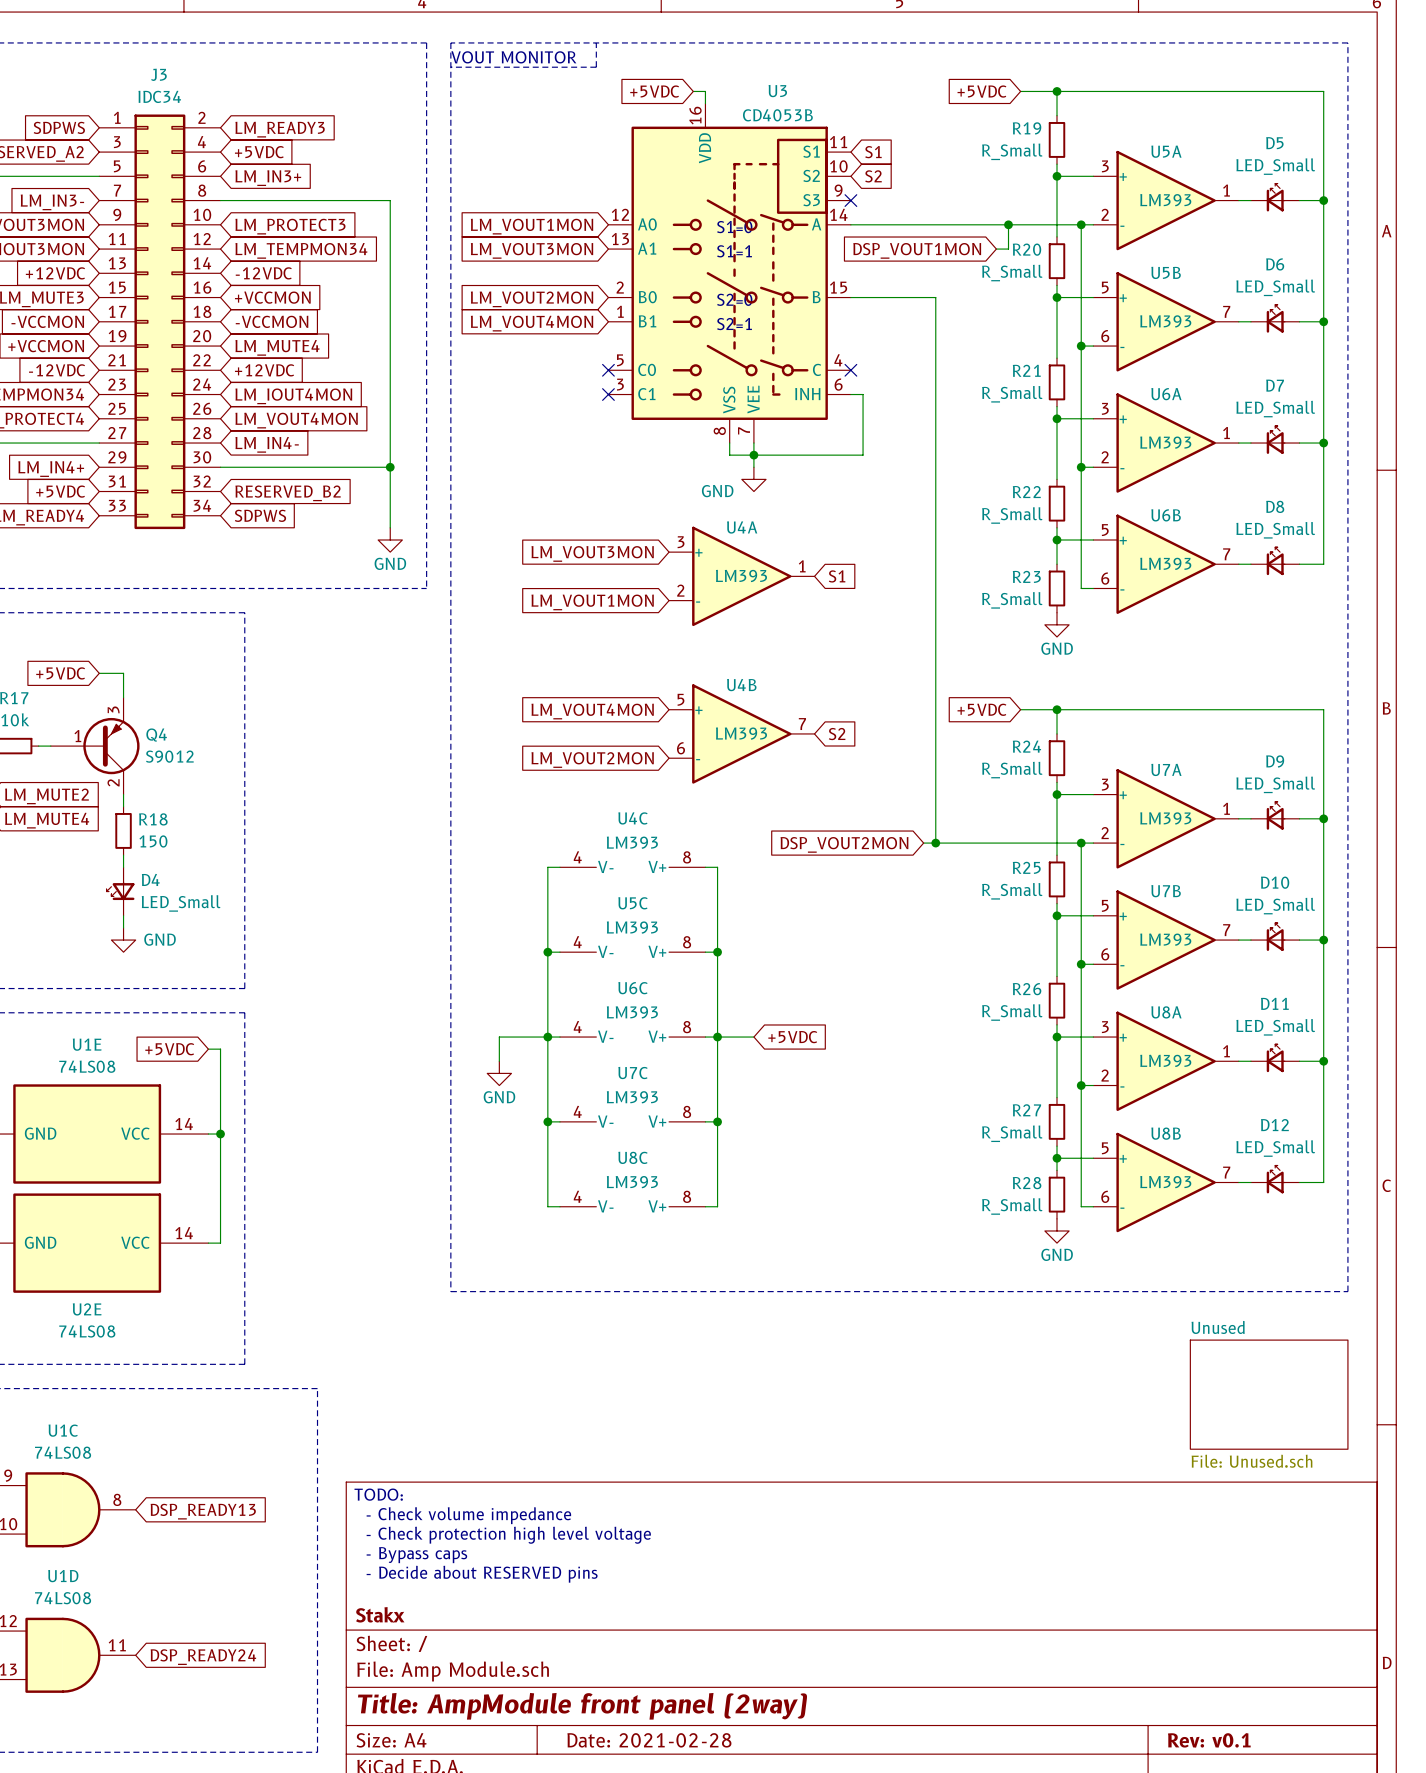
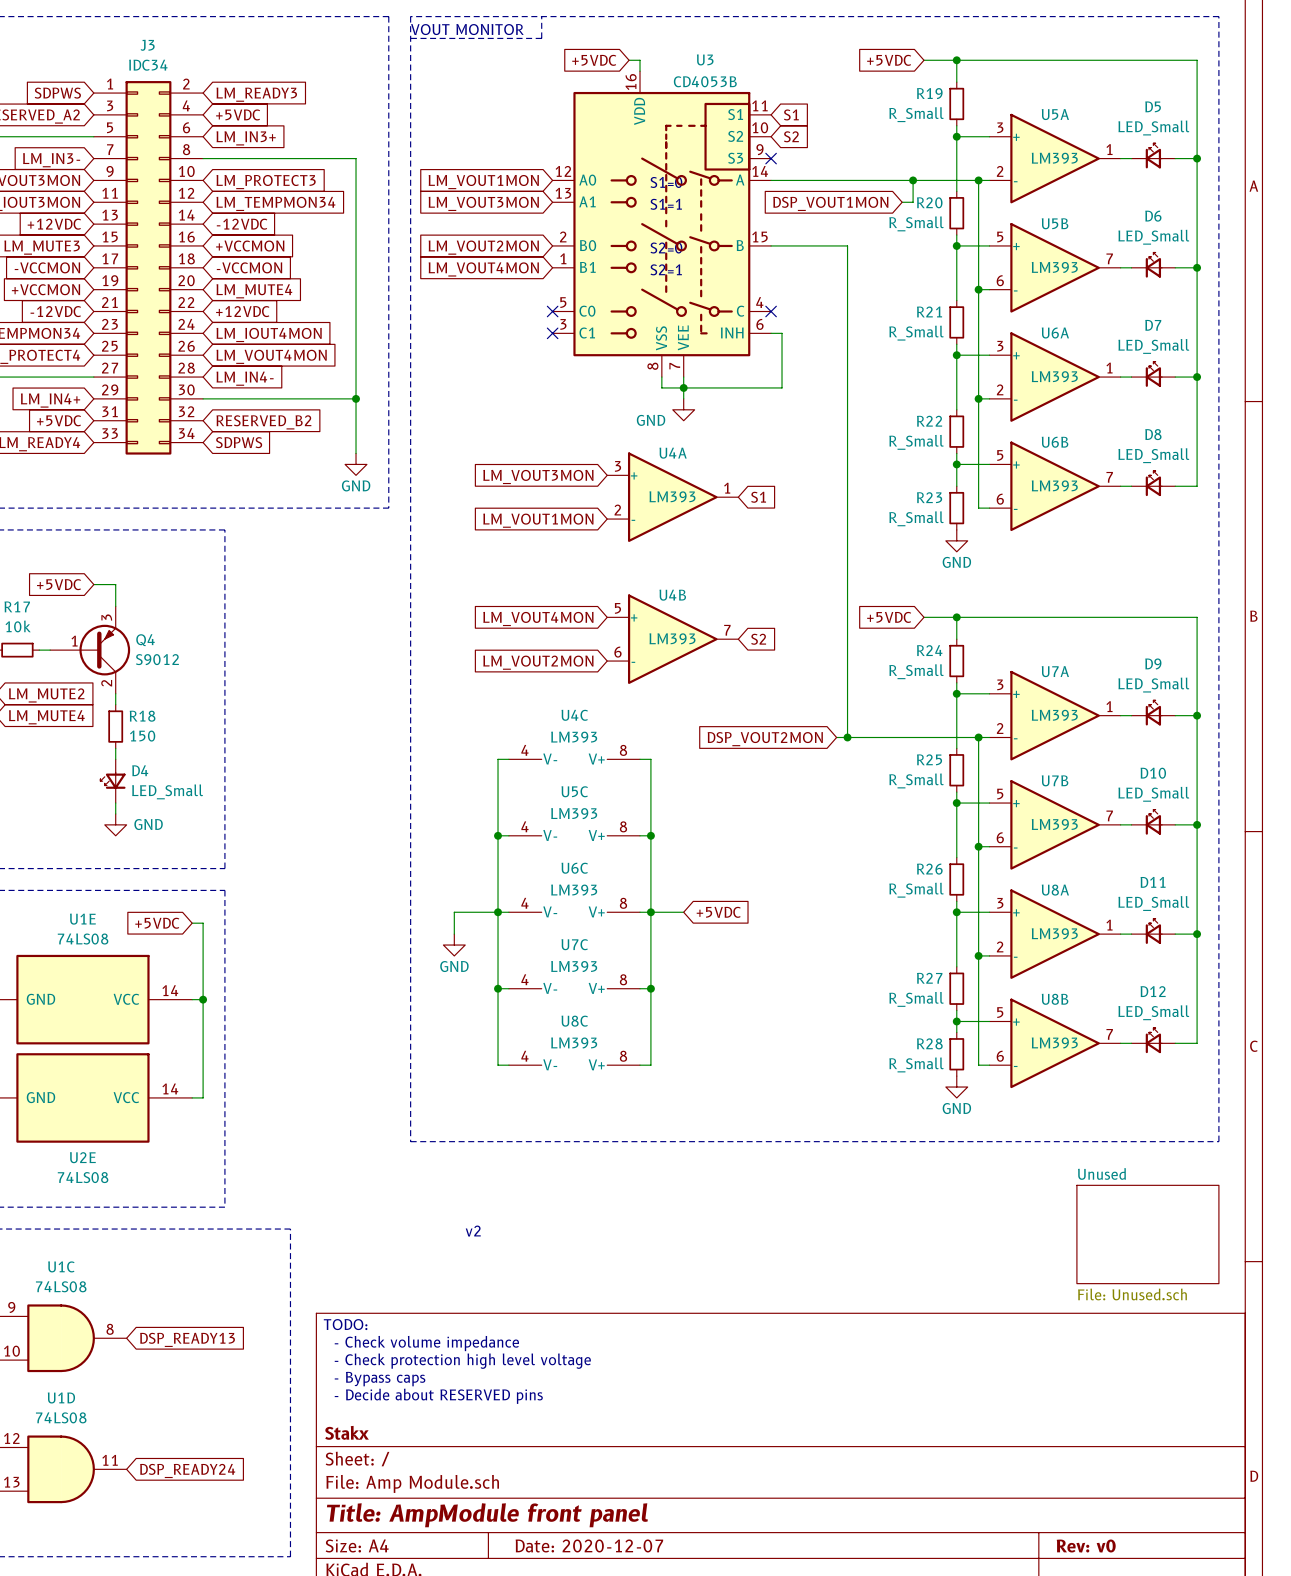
text: none -> v2 (473, 1231)
title block: Title: AmpModule front panel (2way) (582, 1706) -> Title: AmpModule front panel (487, 1515)
title block: Date: 2021-02-28 (649, 1740) -> Date: 2020-12-07 (589, 1545)
title block: Rev: v0.1 (1209, 1740) -> Rev: v0 (1086, 1546)

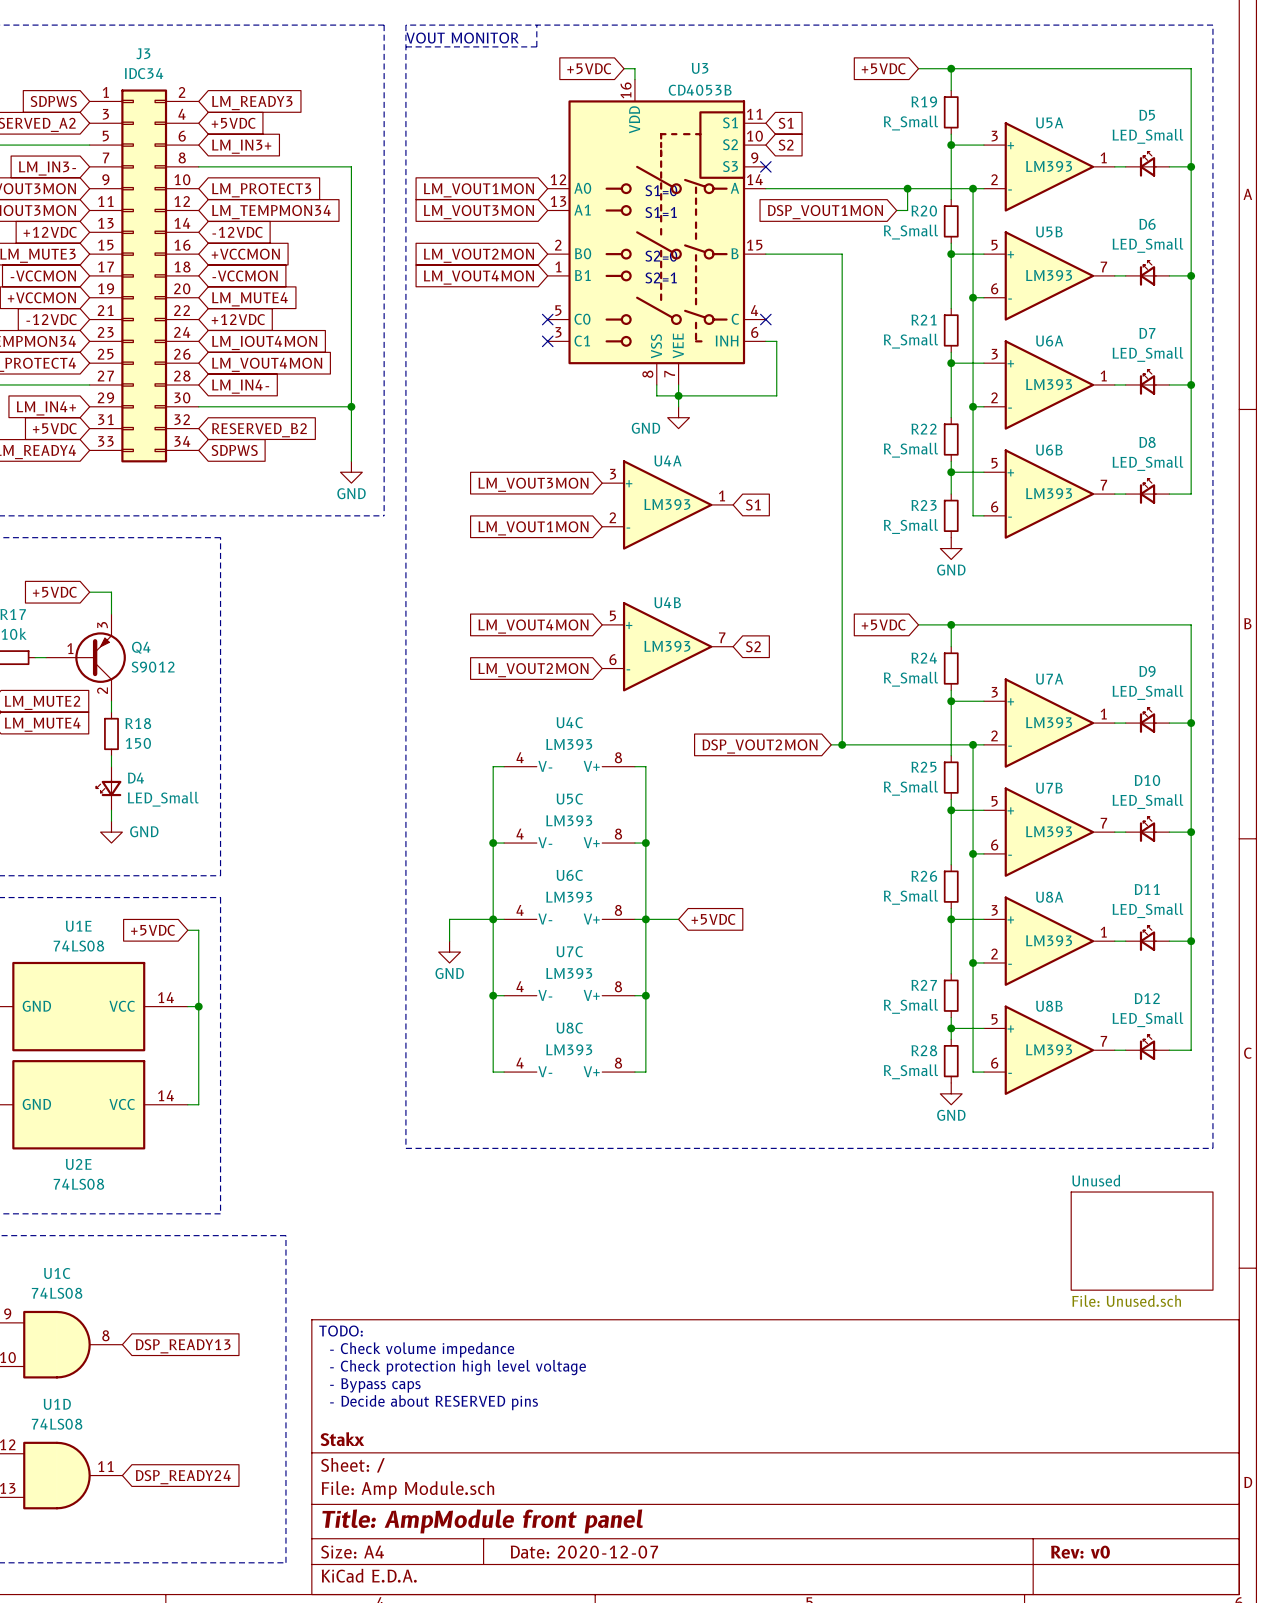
text: v2 (473, 1231) -> none

